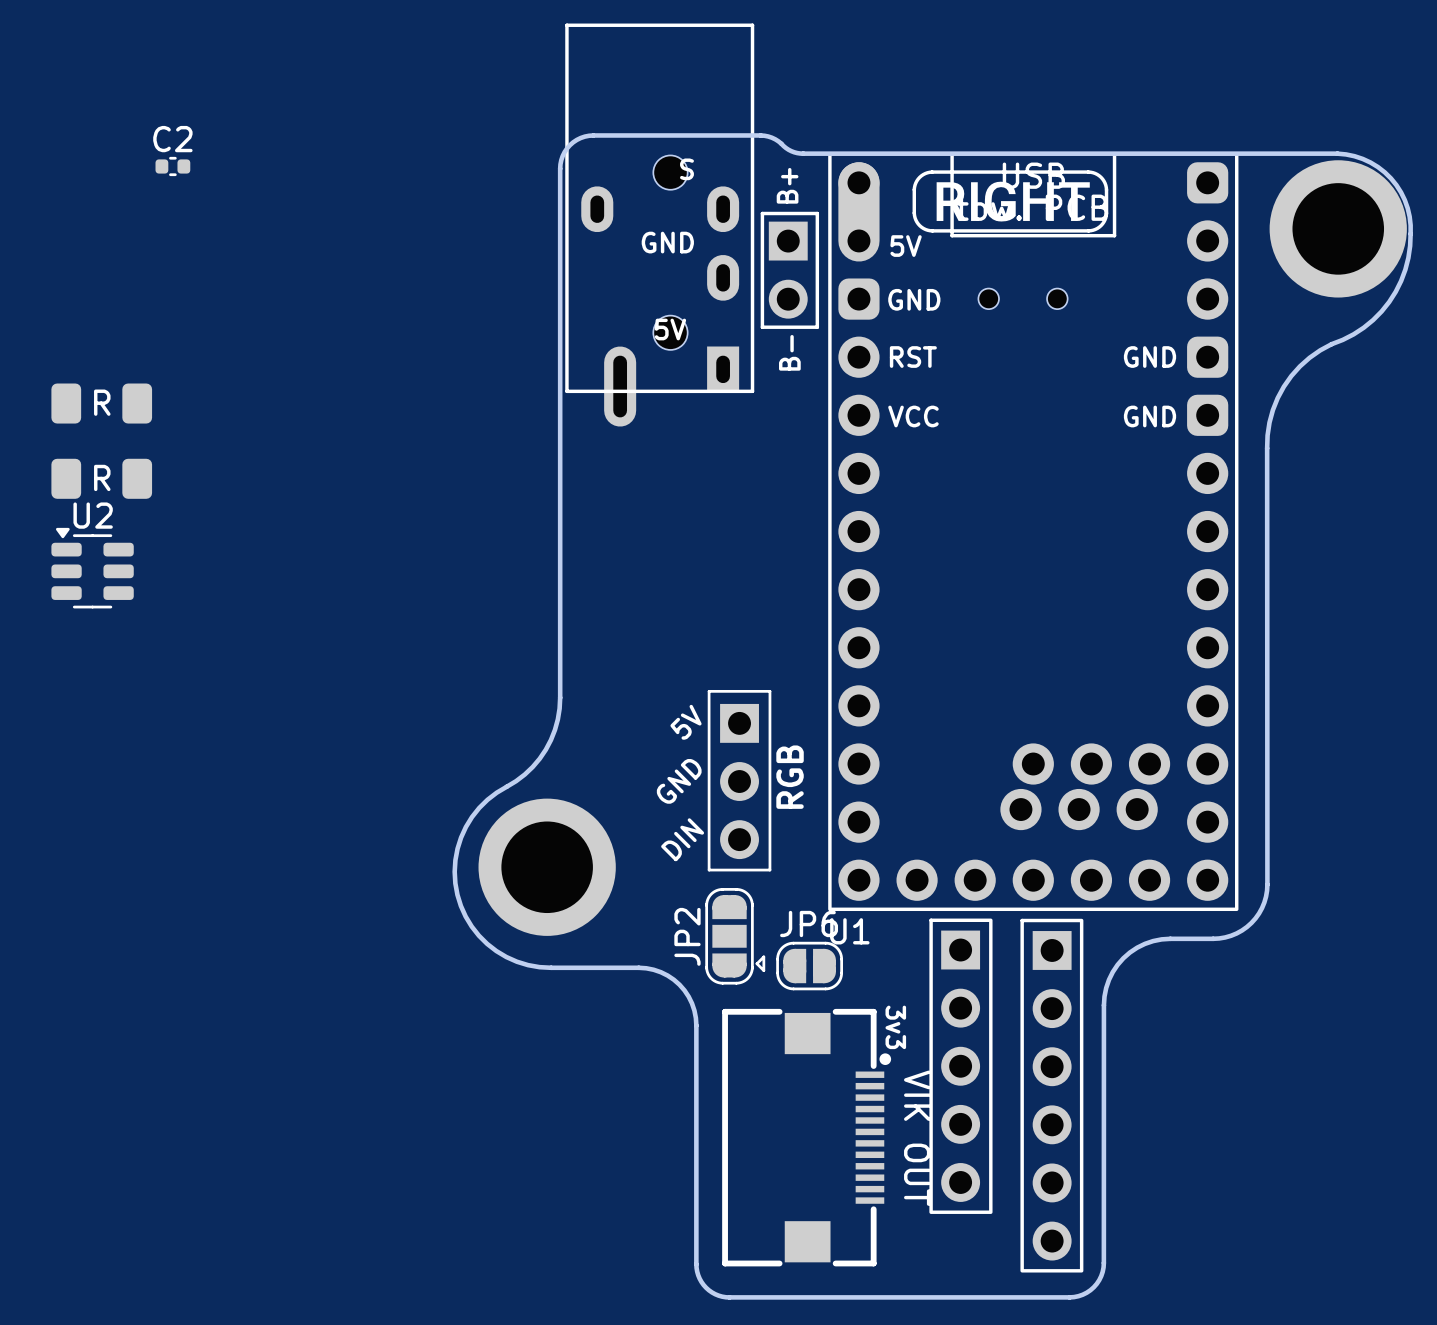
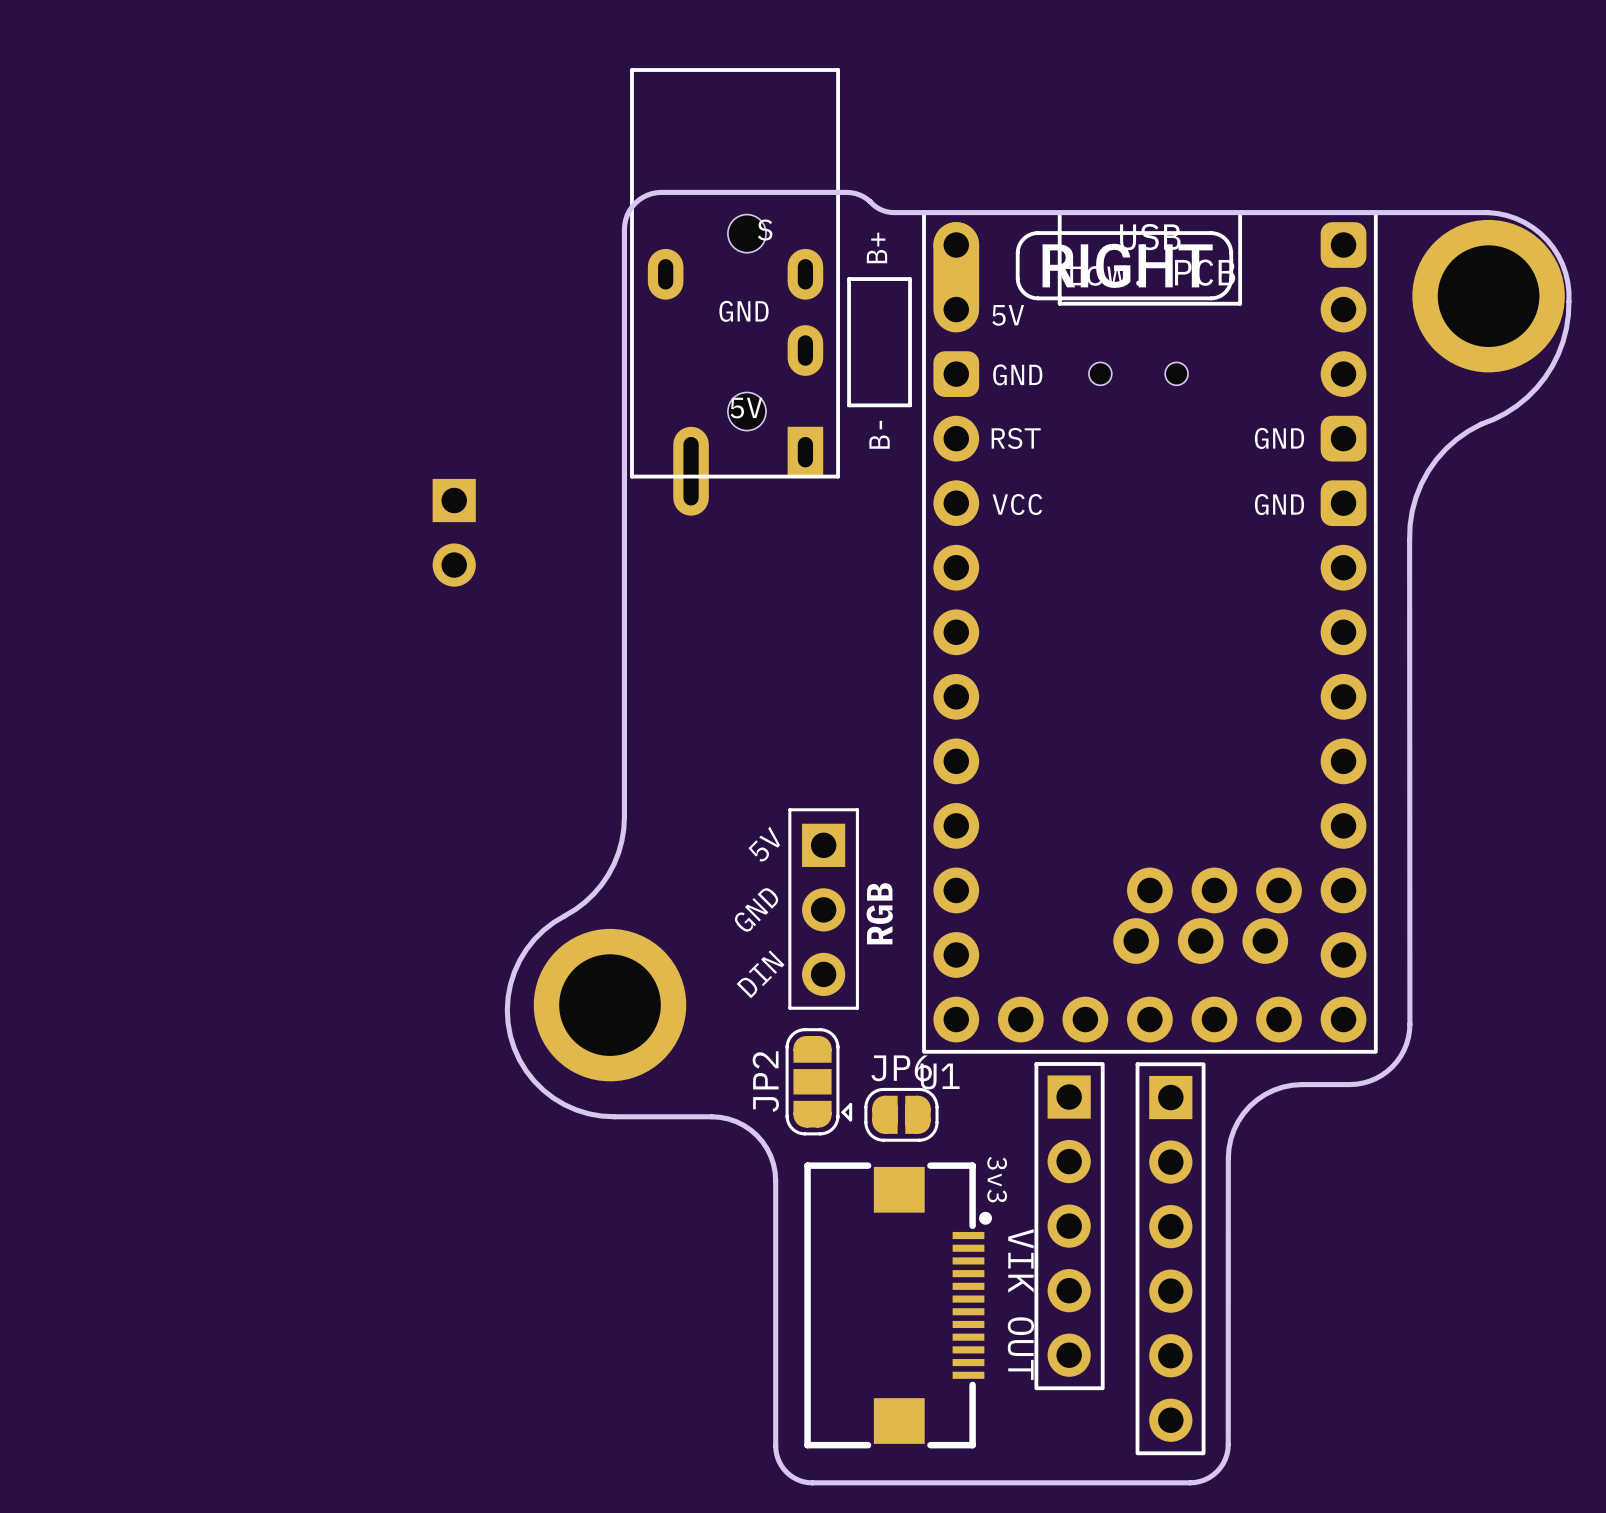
C2: (172, 166) -> none
part position: (788, 270) -> (454, 532)
part: (101, 403) -> none
part: (101, 478) -> none
U2: (92, 568) -> none

